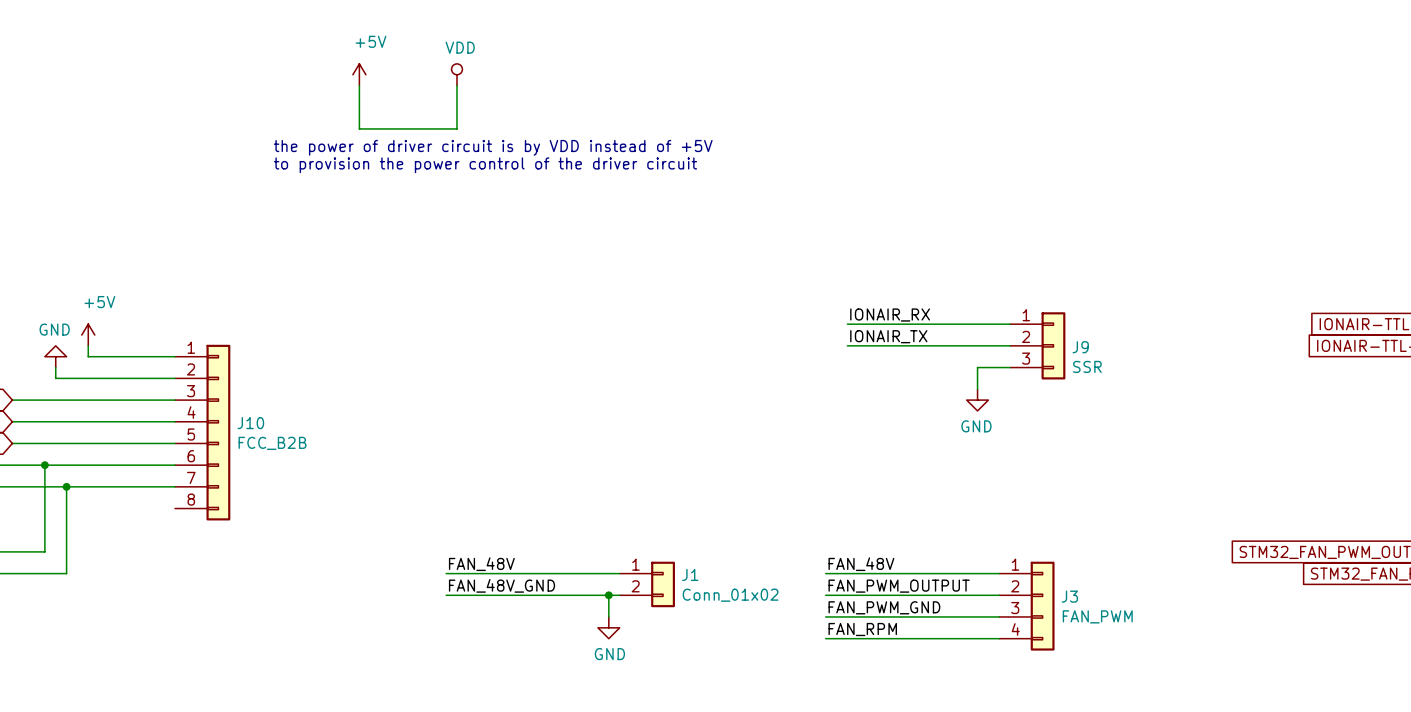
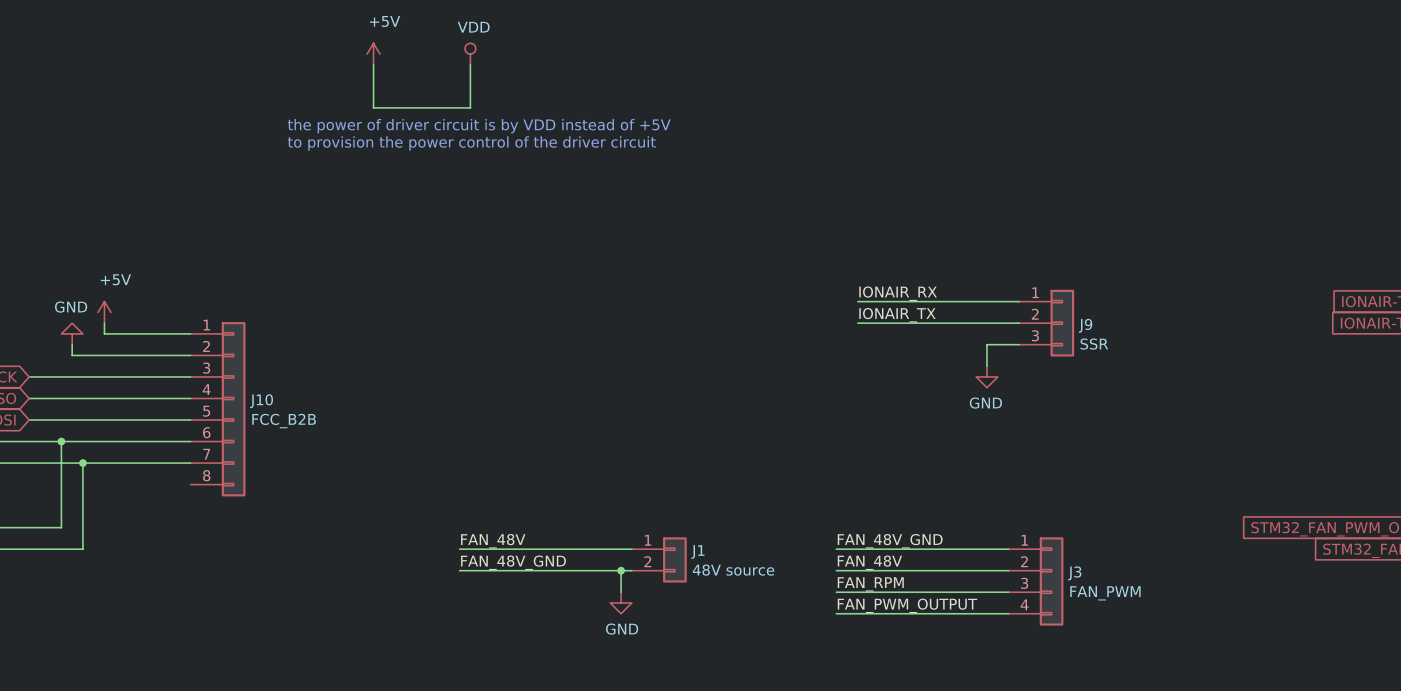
label: FAN_48V (861, 564) -> FAN_48V_GND (890, 541)
label: FAN_PWM_OUTPUT (899, 586) -> FAN_48V (869, 562)
J1 value: Conn_01x02 (730, 595) -> 48V source (733, 570)
label: FAN_PWM_GND (884, 607) -> FAN_RPM (870, 584)
label: FAN_RPM (862, 629) -> FAN_PWM_OUTPUT (907, 605)

